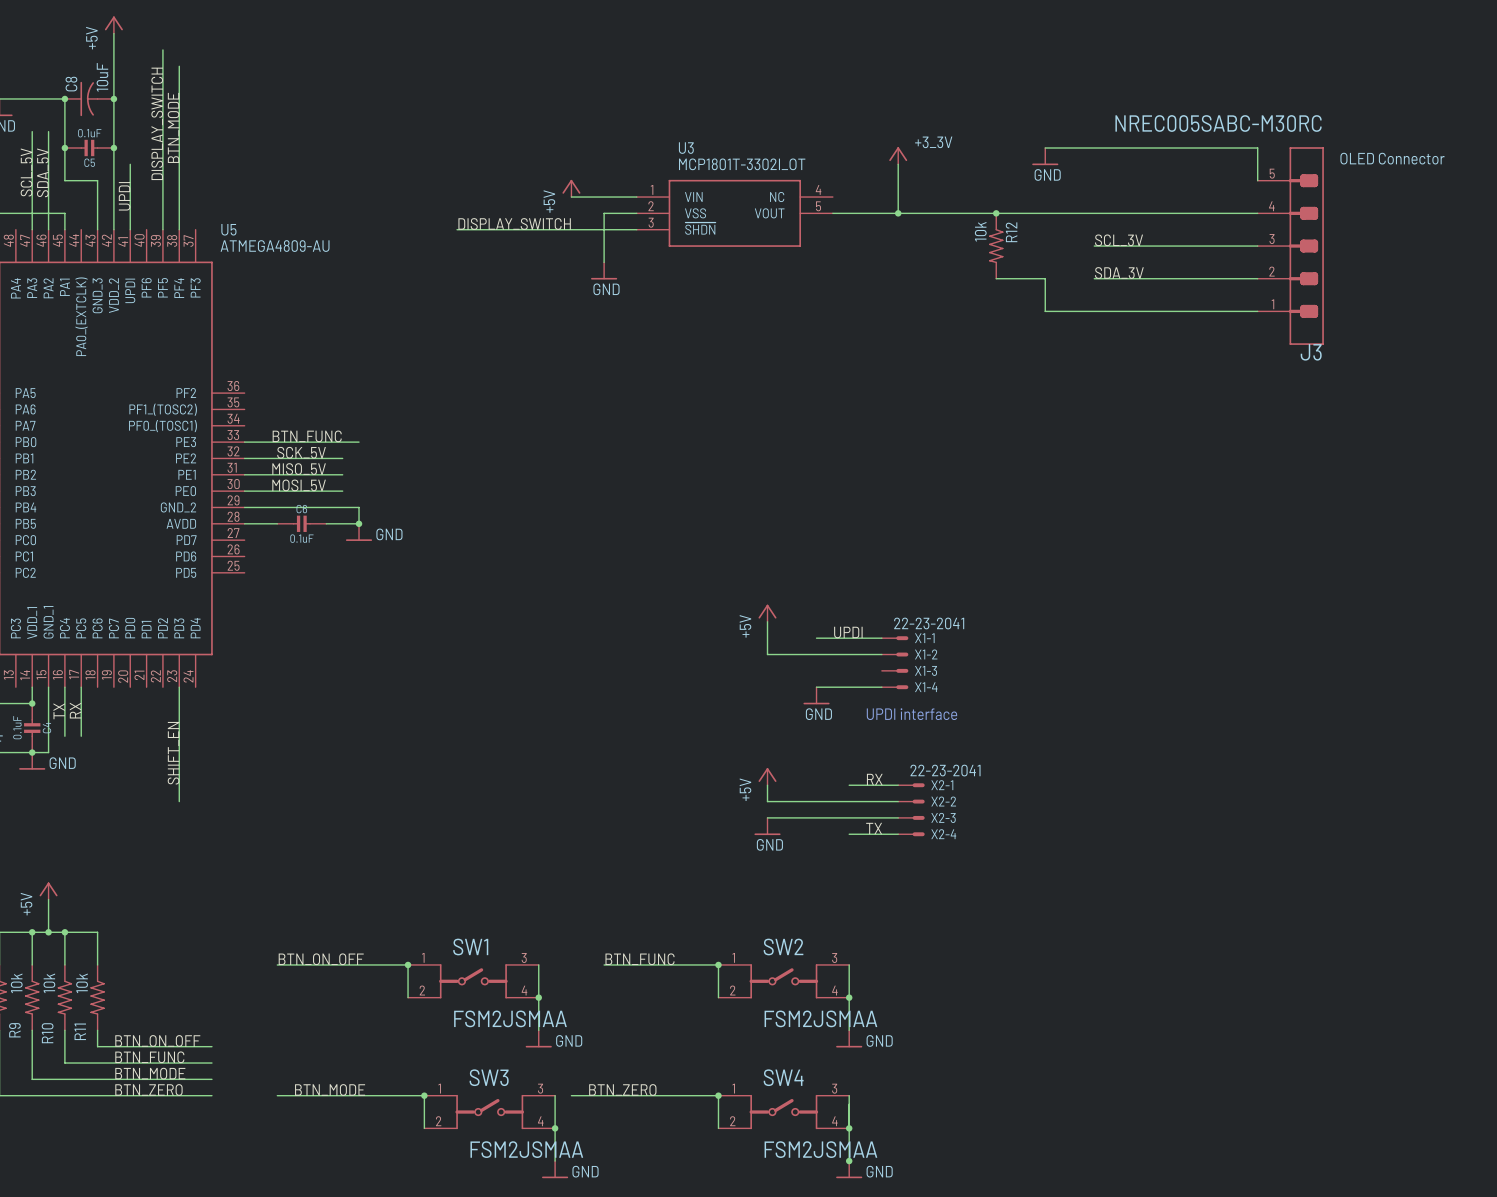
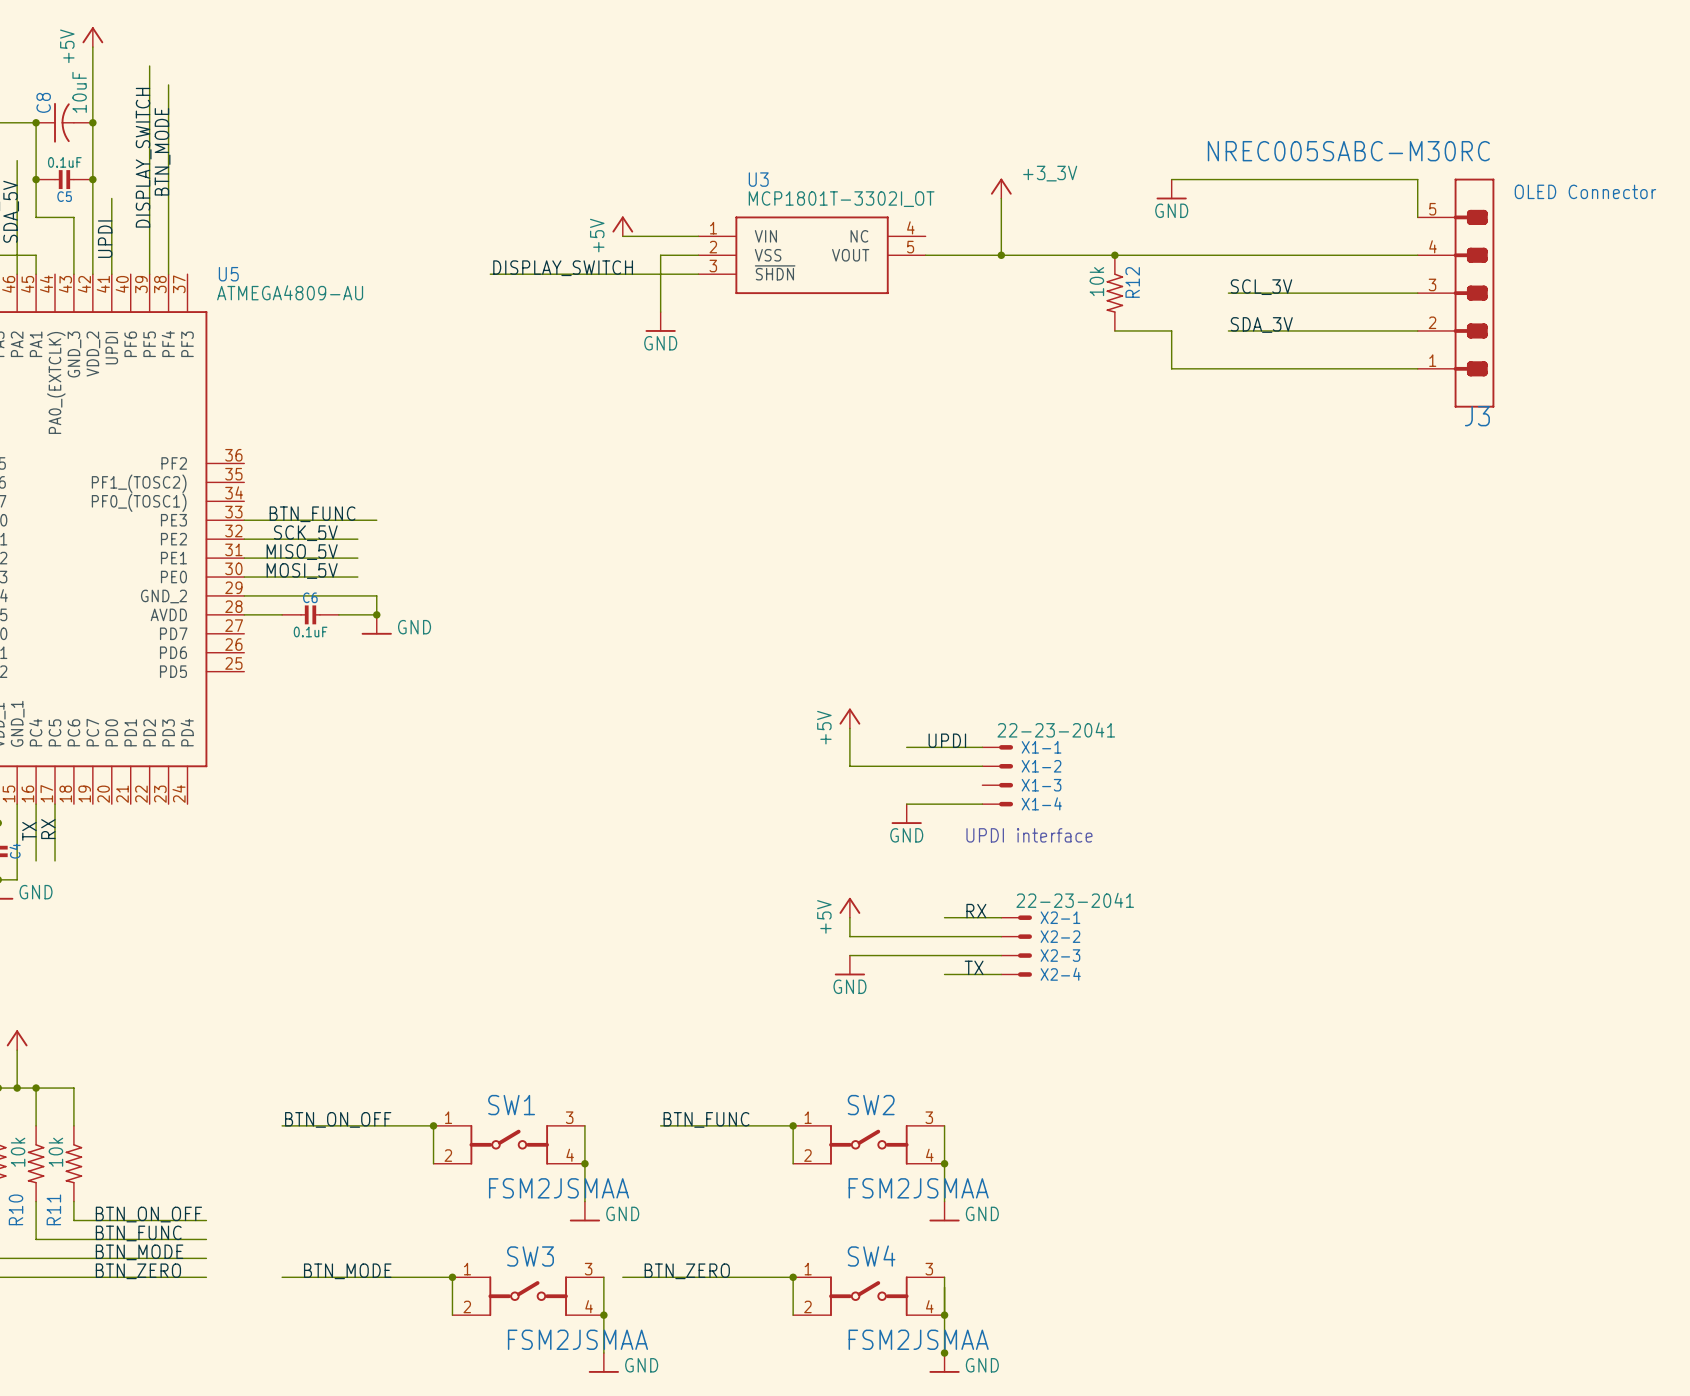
wire: (179, 687) (179, 801) -> none
label: SHIFT_EN (173, 753) -> none

